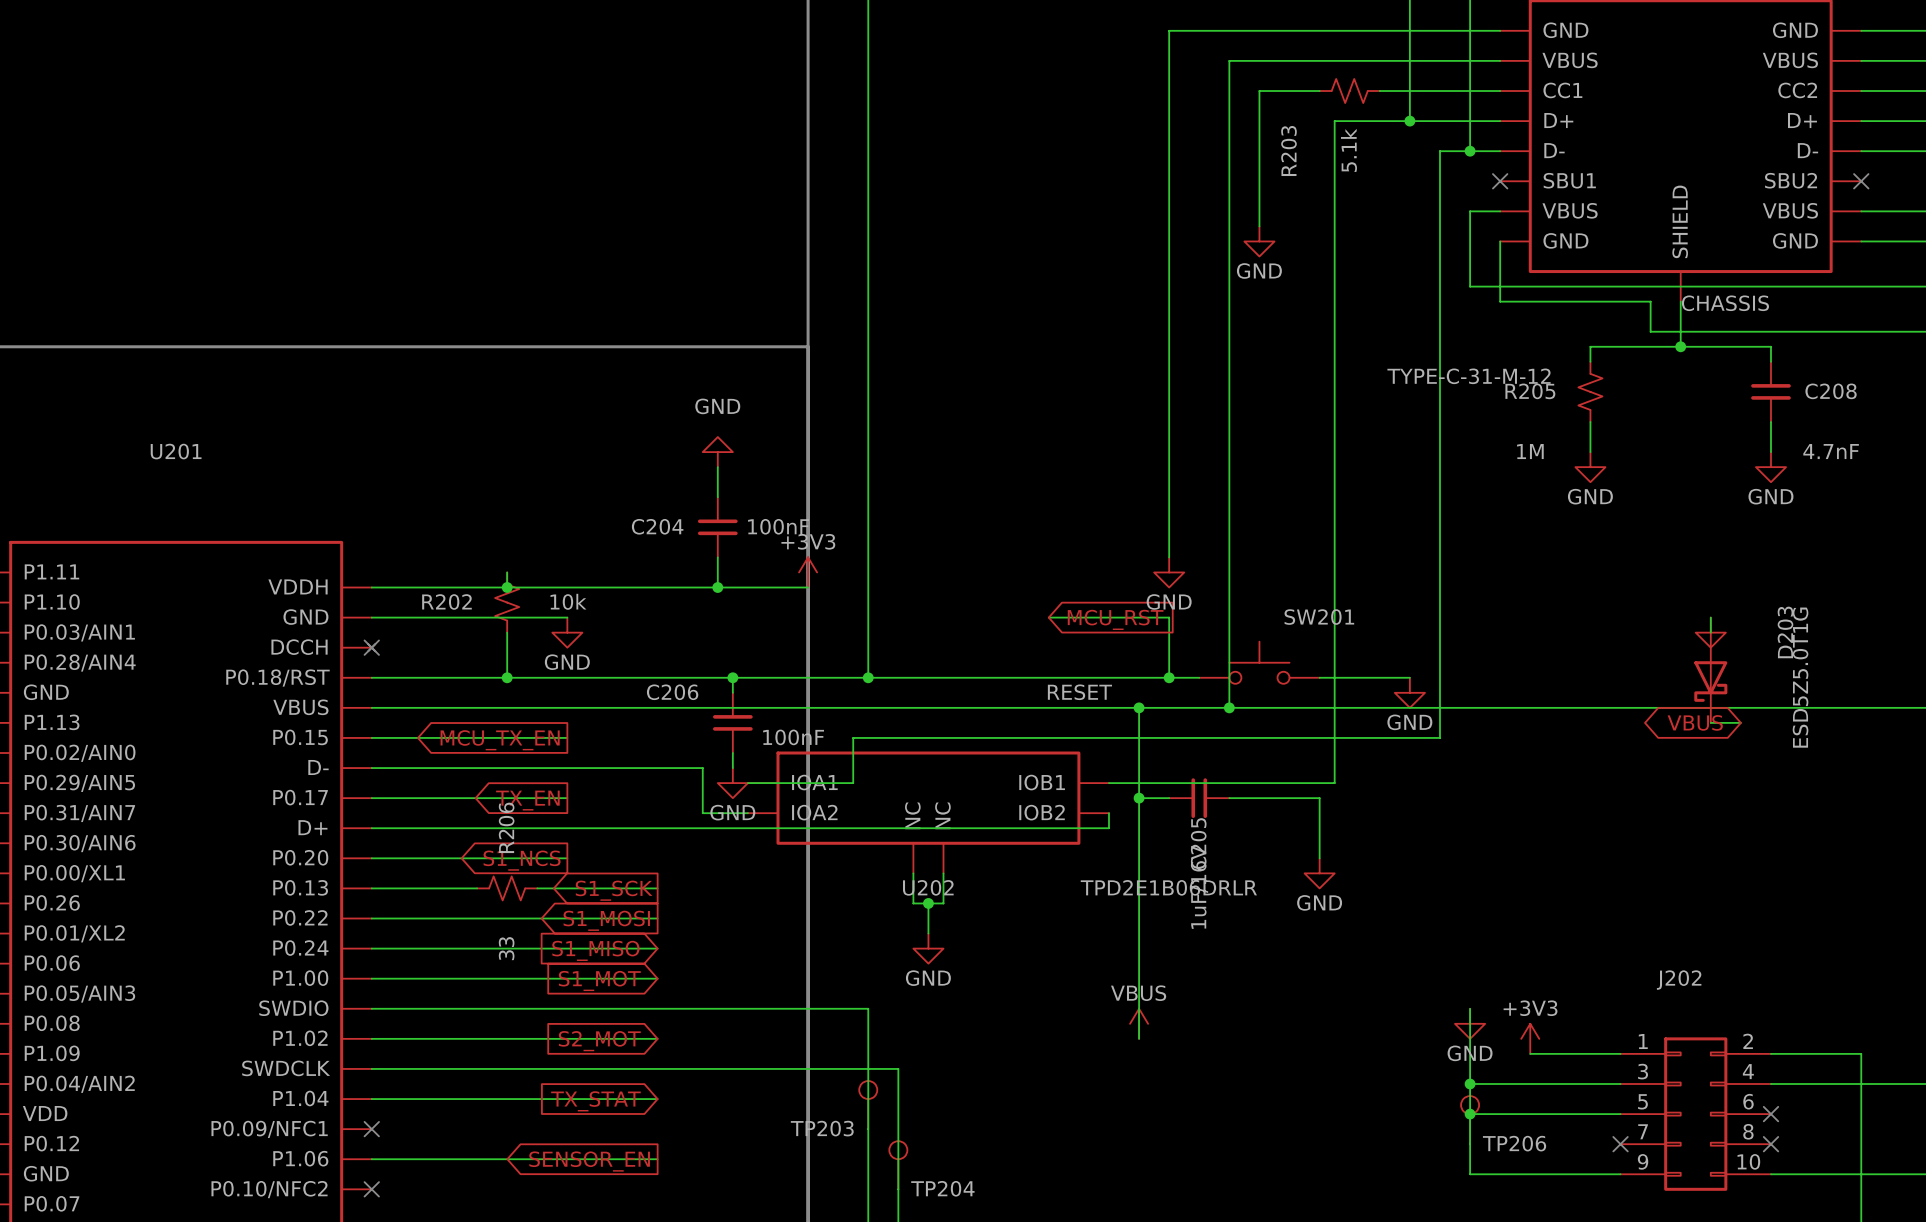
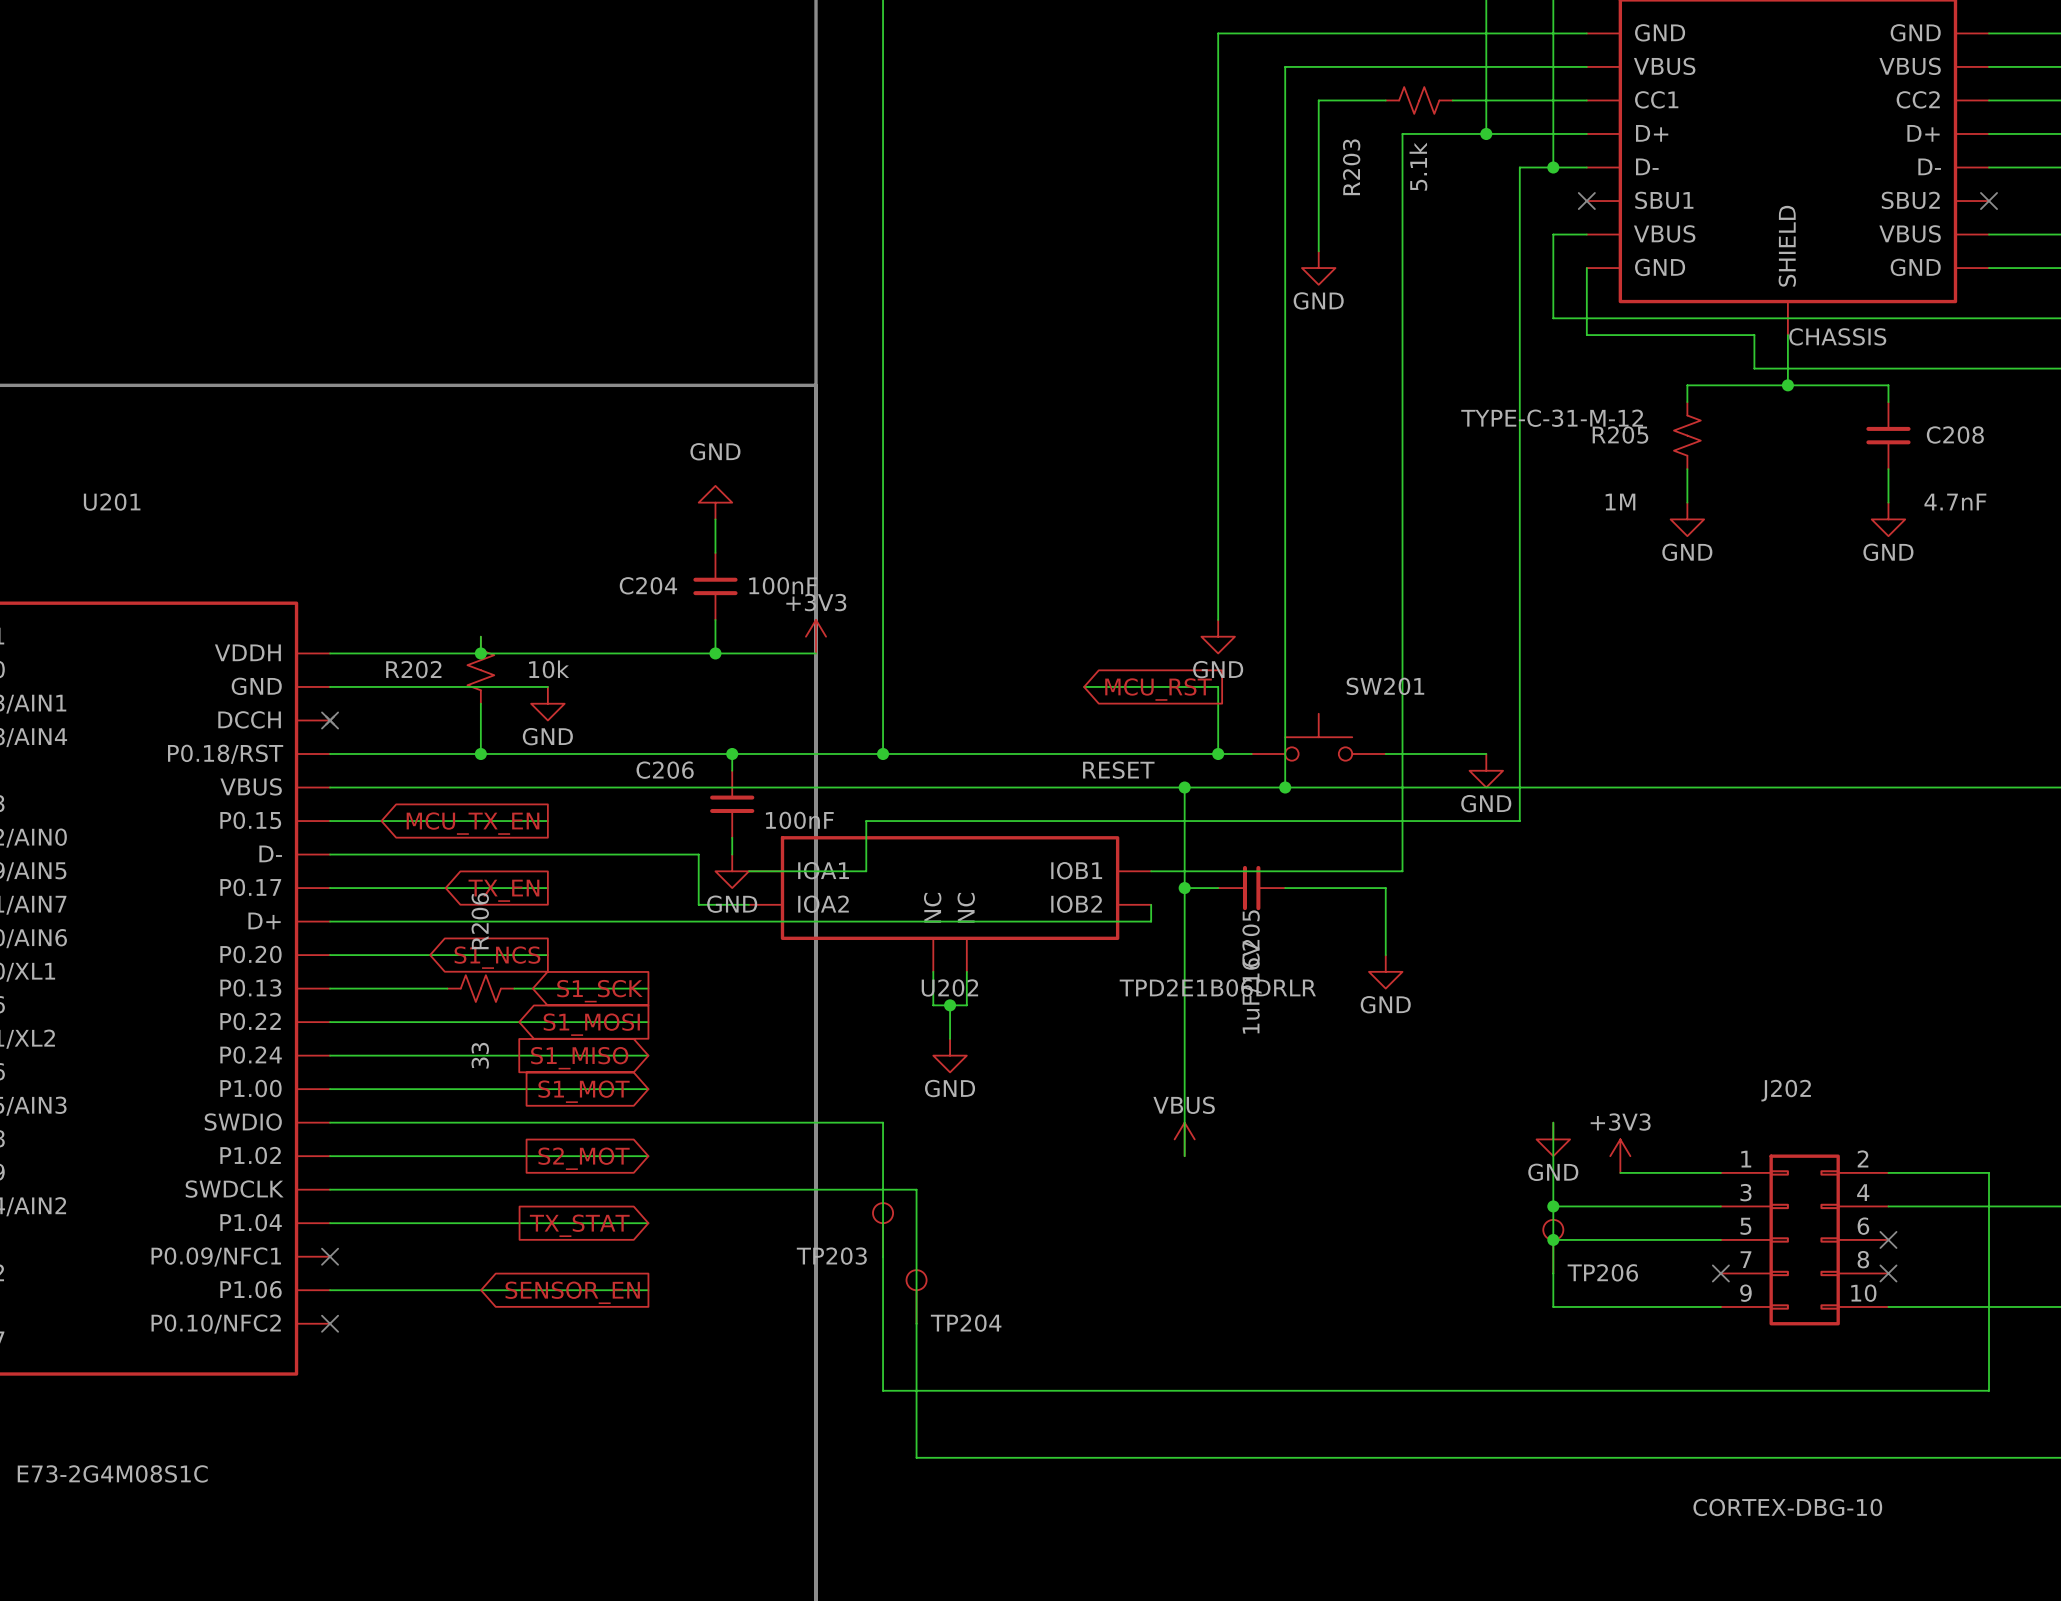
wire: (1710, 617) (1710, 632) -> none
power symbol: (1710, 632) -> none
D203: ESD5Z5.0T1G (1710, 677) -> none
global label: VBUS (1695, 722) -> none
wire: (1710, 722) (1740, 722) -> none

